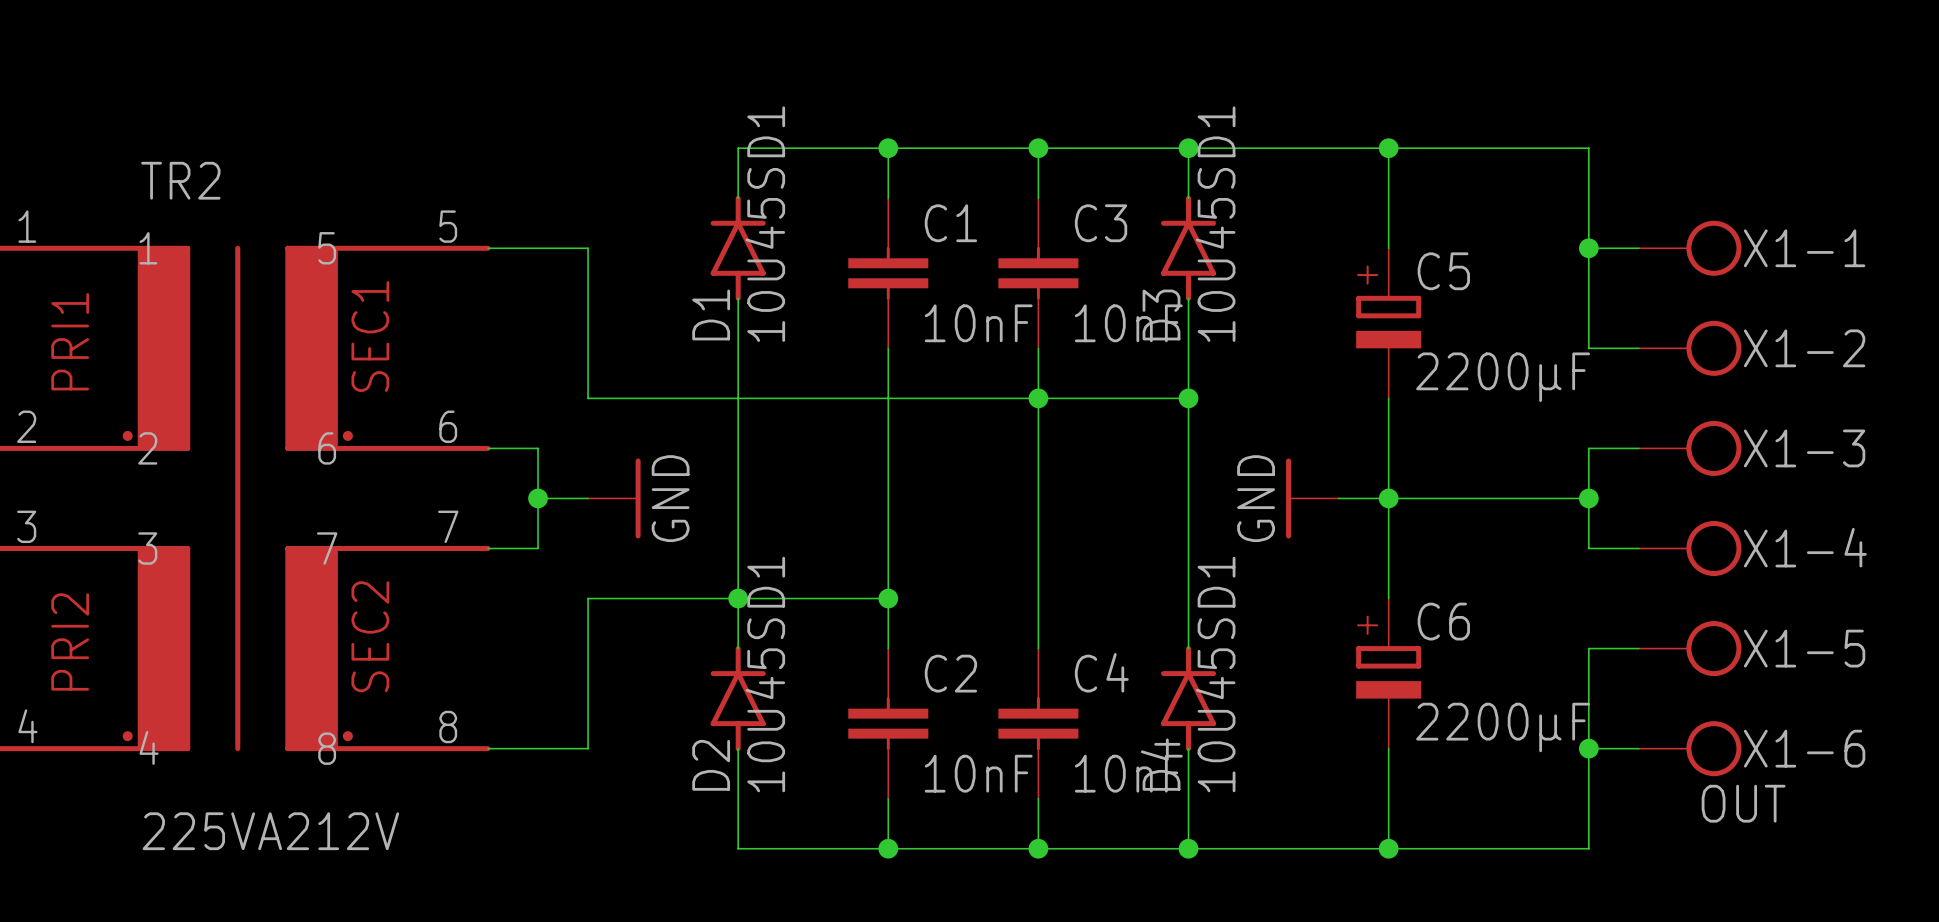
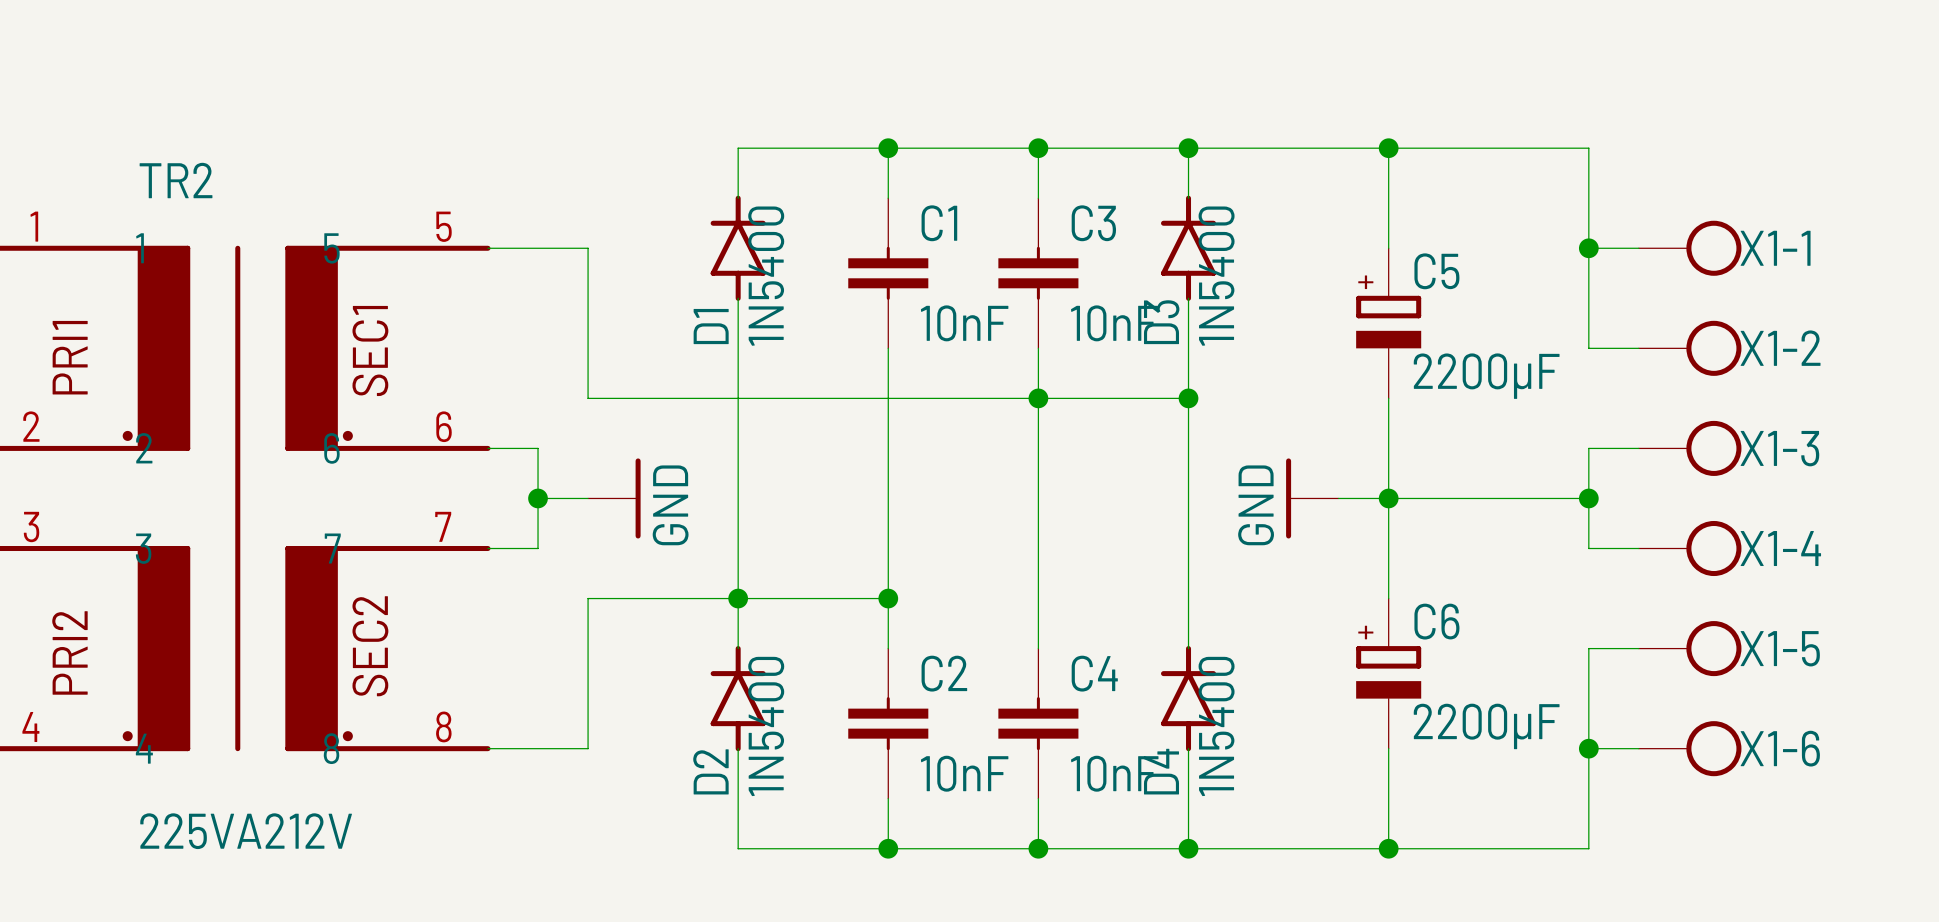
D1 value: 10U45SD1 (765, 224) -> 1N5400 (766, 276)
D3 value: 10U45SD1 (1215, 224) -> 1N5400 (1216, 276)
D2 value: 10U45SD1 (765, 674) -> 1N5400 (766, 726)
D4 value: 10U45SD1 (1215, 674) -> 1N5400 (1216, 726)
X1-6 value: OUT (1743, 803) -> none

